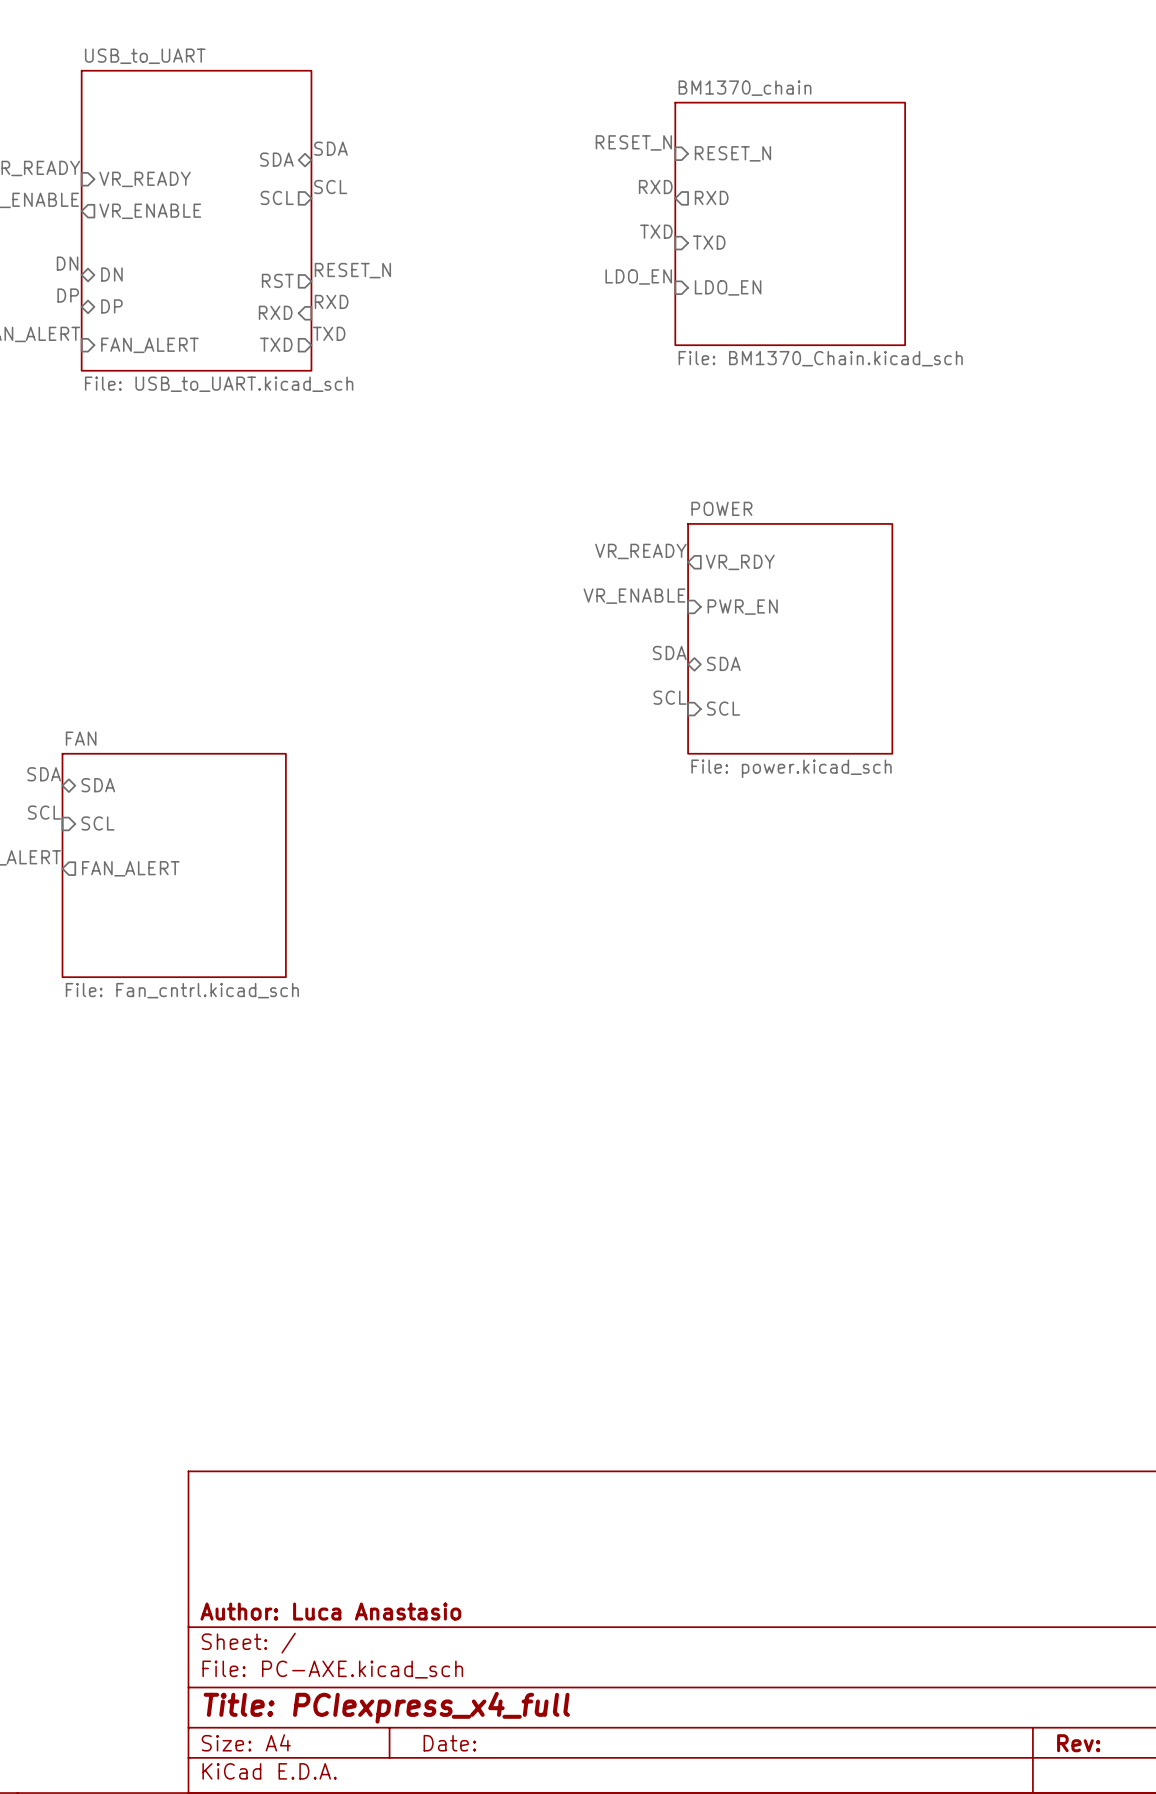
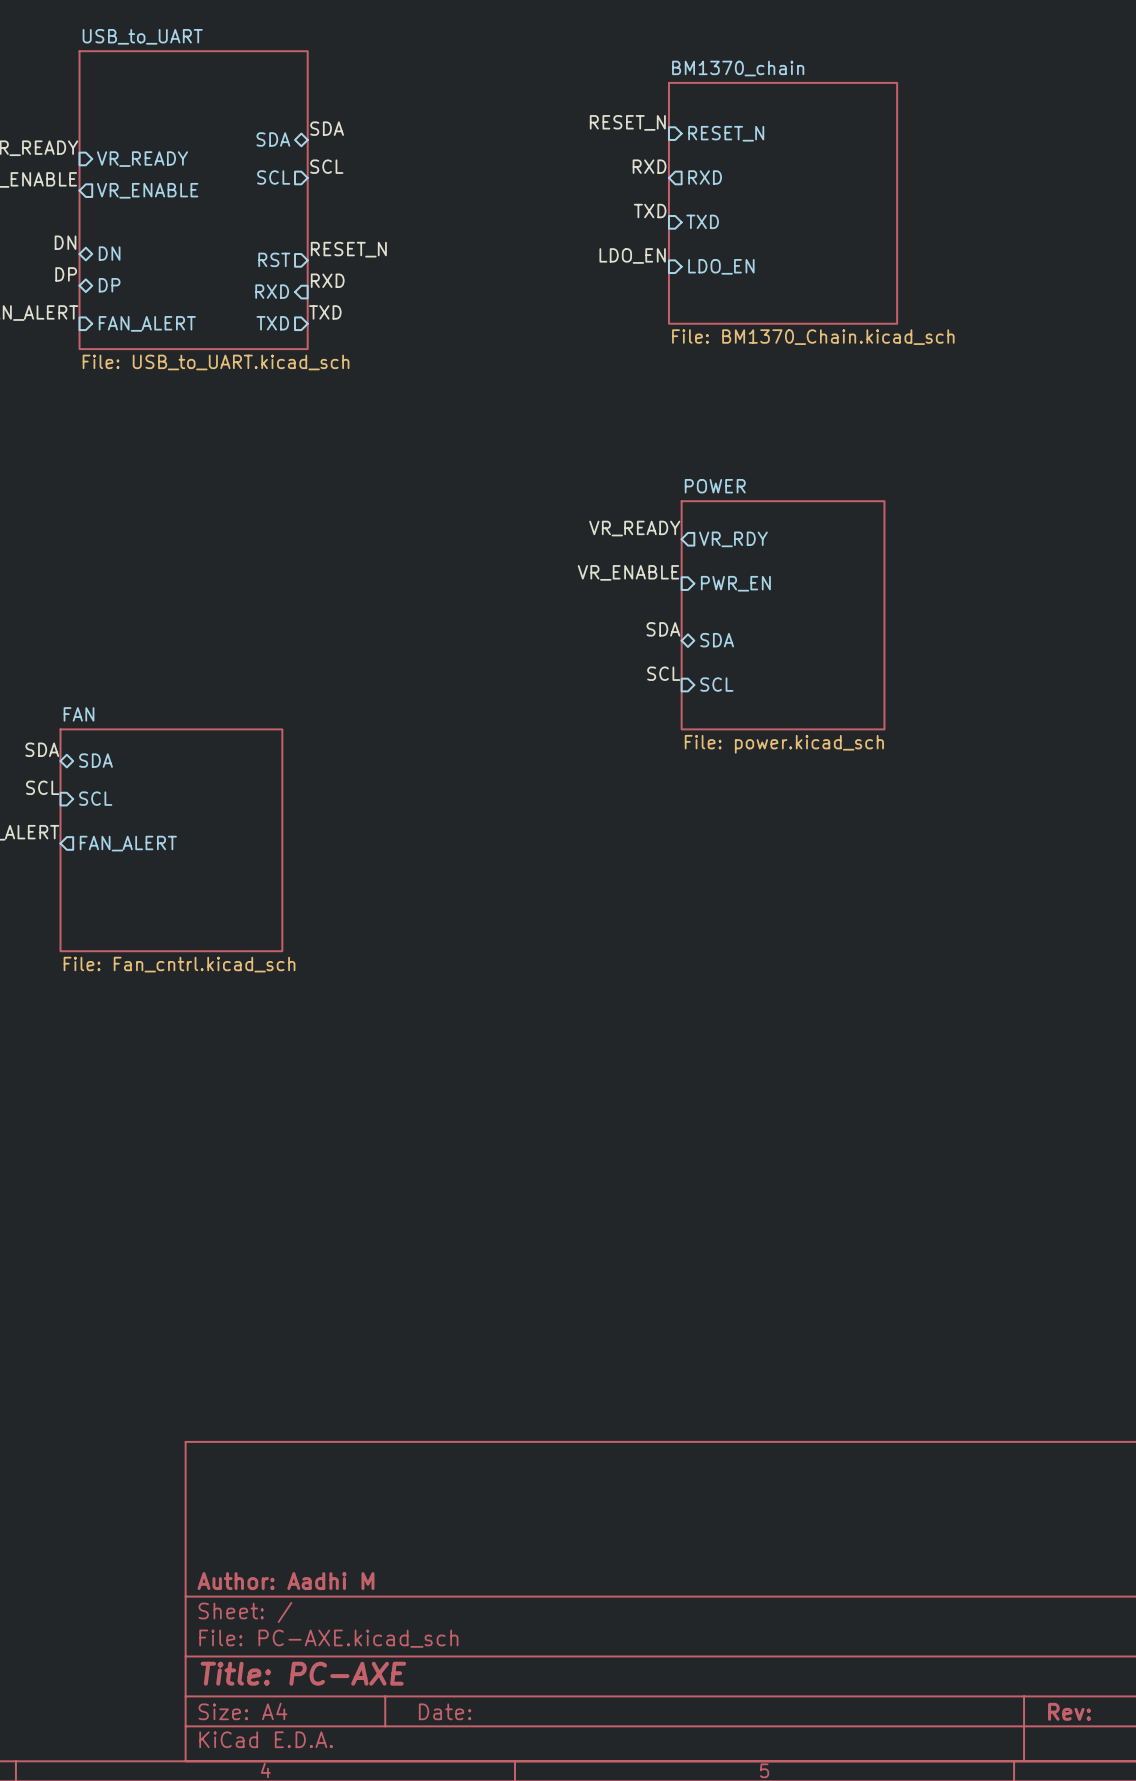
title block: Author: Luca Anastasio (330, 1611) -> Author: Aadhi M (285, 1581)
title block: Title: PCIexpress_x4_full (386, 1707) -> Title: PC-AXE (303, 1673)

